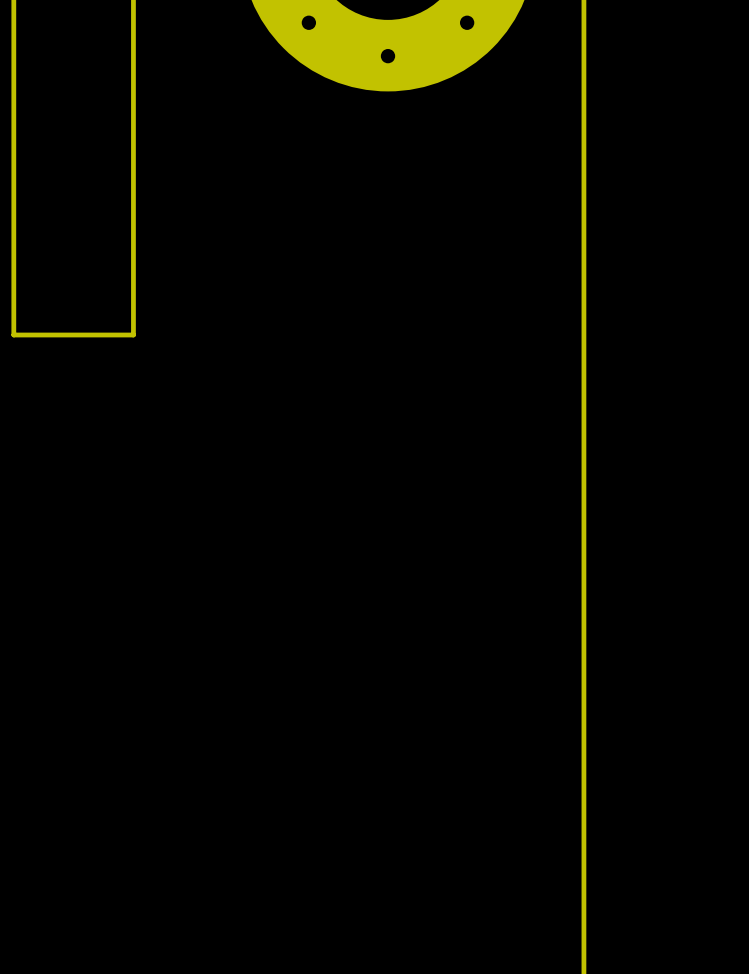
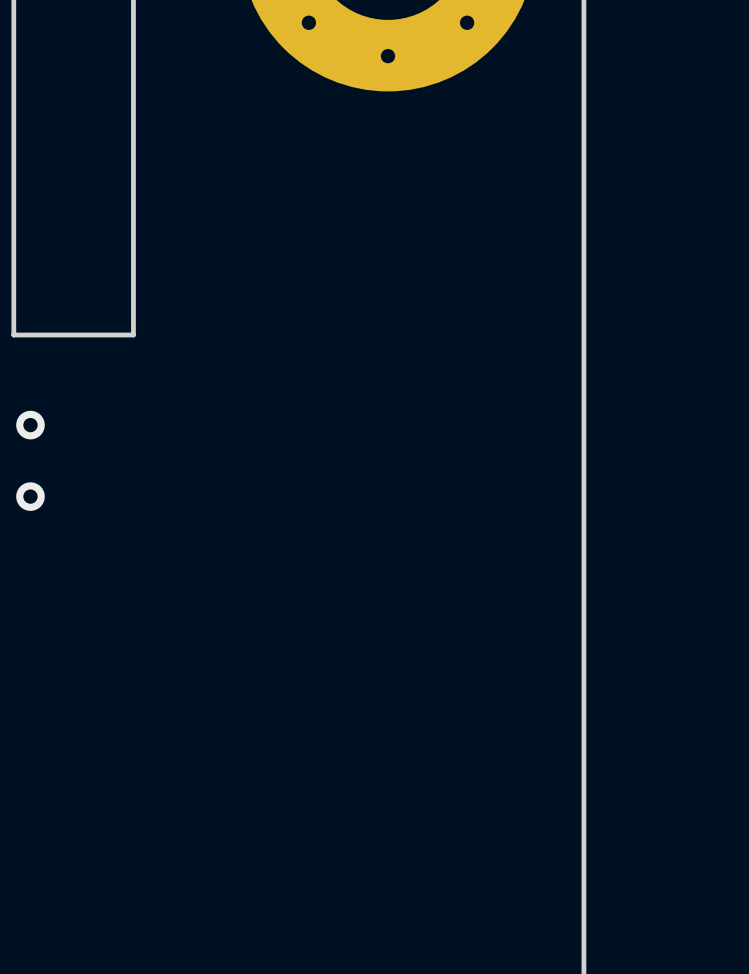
via: none -> (30, 425)
via: none -> (30, 496)

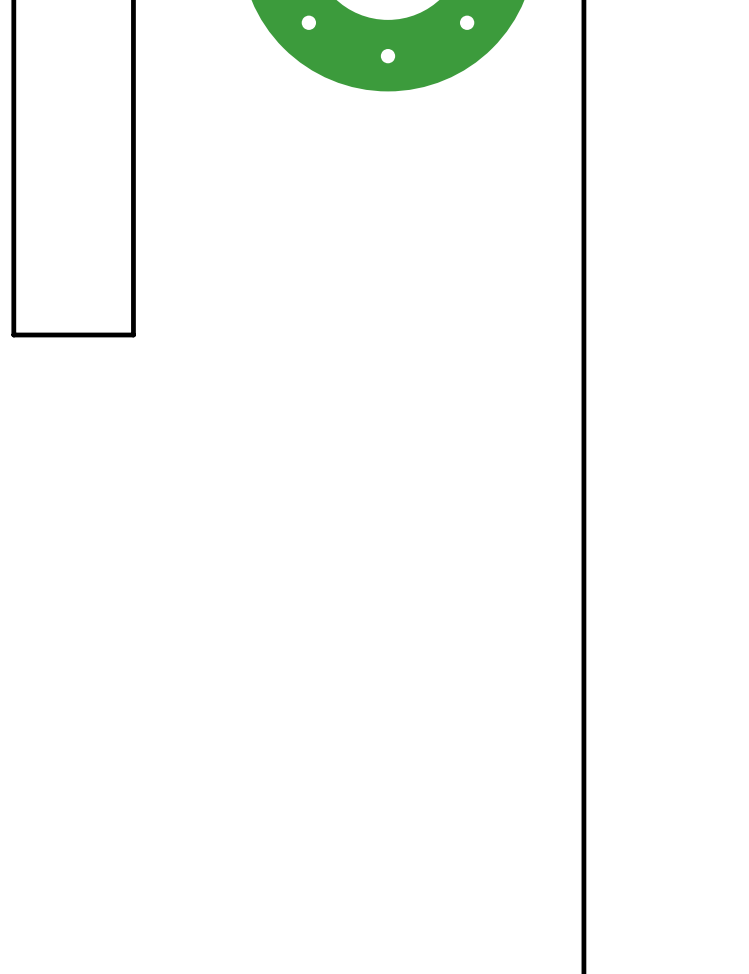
via: (30, 425) -> none
via: (30, 496) -> none

